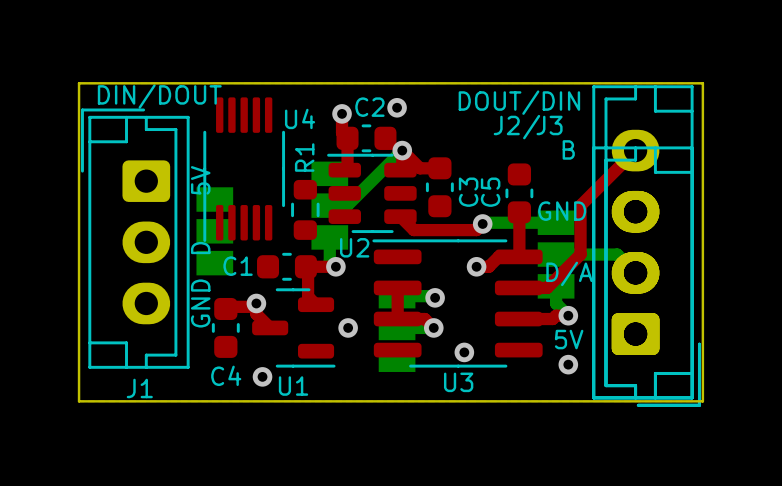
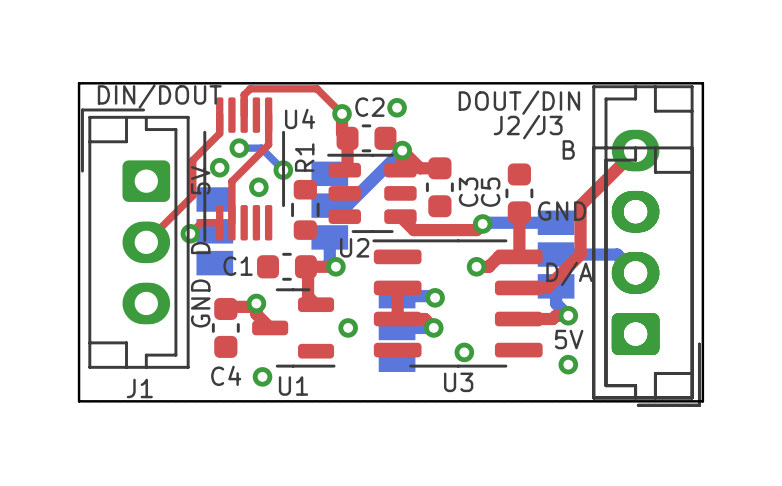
top track: none -> (342, 113) (316, 88) (250, 88) (244, 94) (244, 115)
top track: none -> (219, 115) (219, 133) (192, 160) (192, 195) (146, 242)
top track: none -> (268, 115) (268, 144) (231, 181) (231, 222)
bottom track: none -> (239, 148) (261, 148) (283, 170)
via: none -> (239, 148)
via: none -> (219, 167)
via: none -> (283, 170)
via: none -> (258, 187)
top track: none -> (219, 222) (201, 222) (190, 233)
via: none -> (190, 233)

